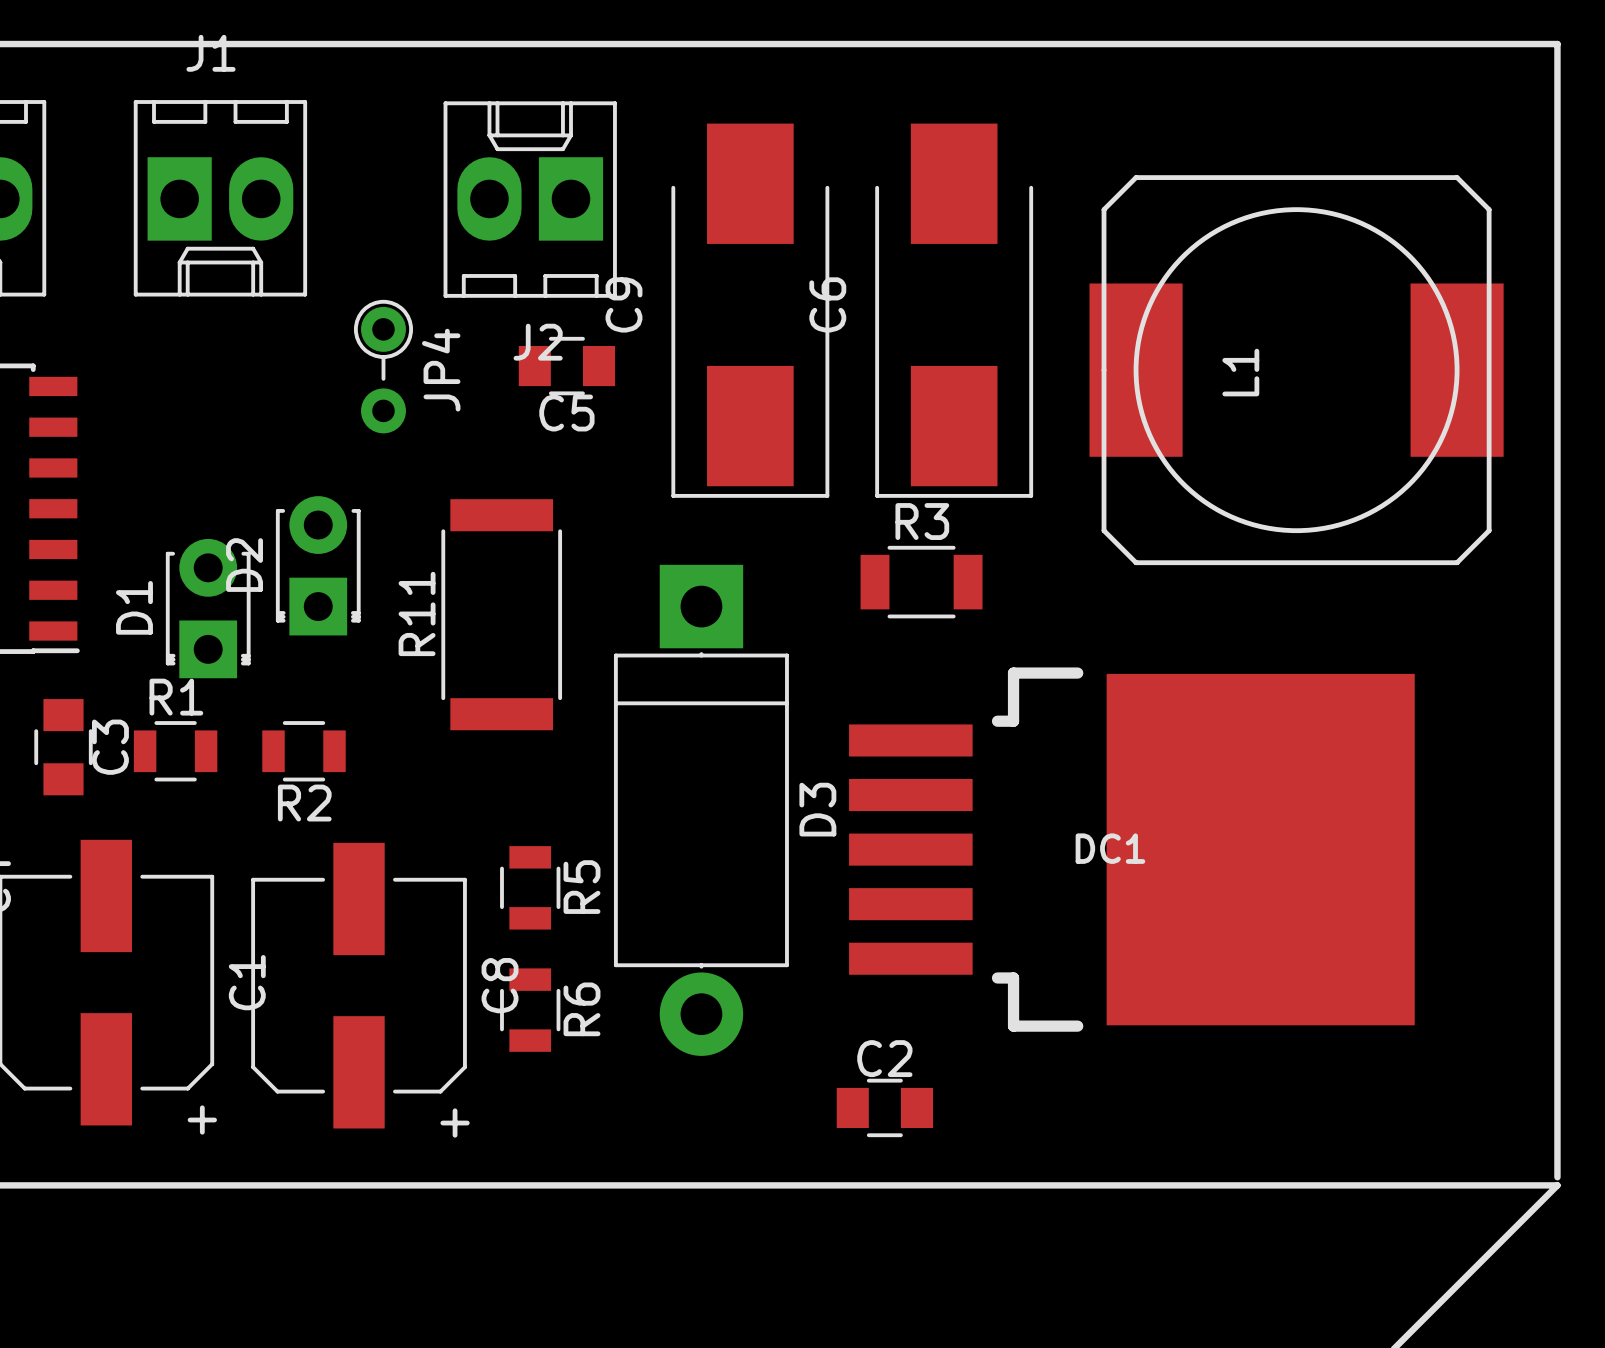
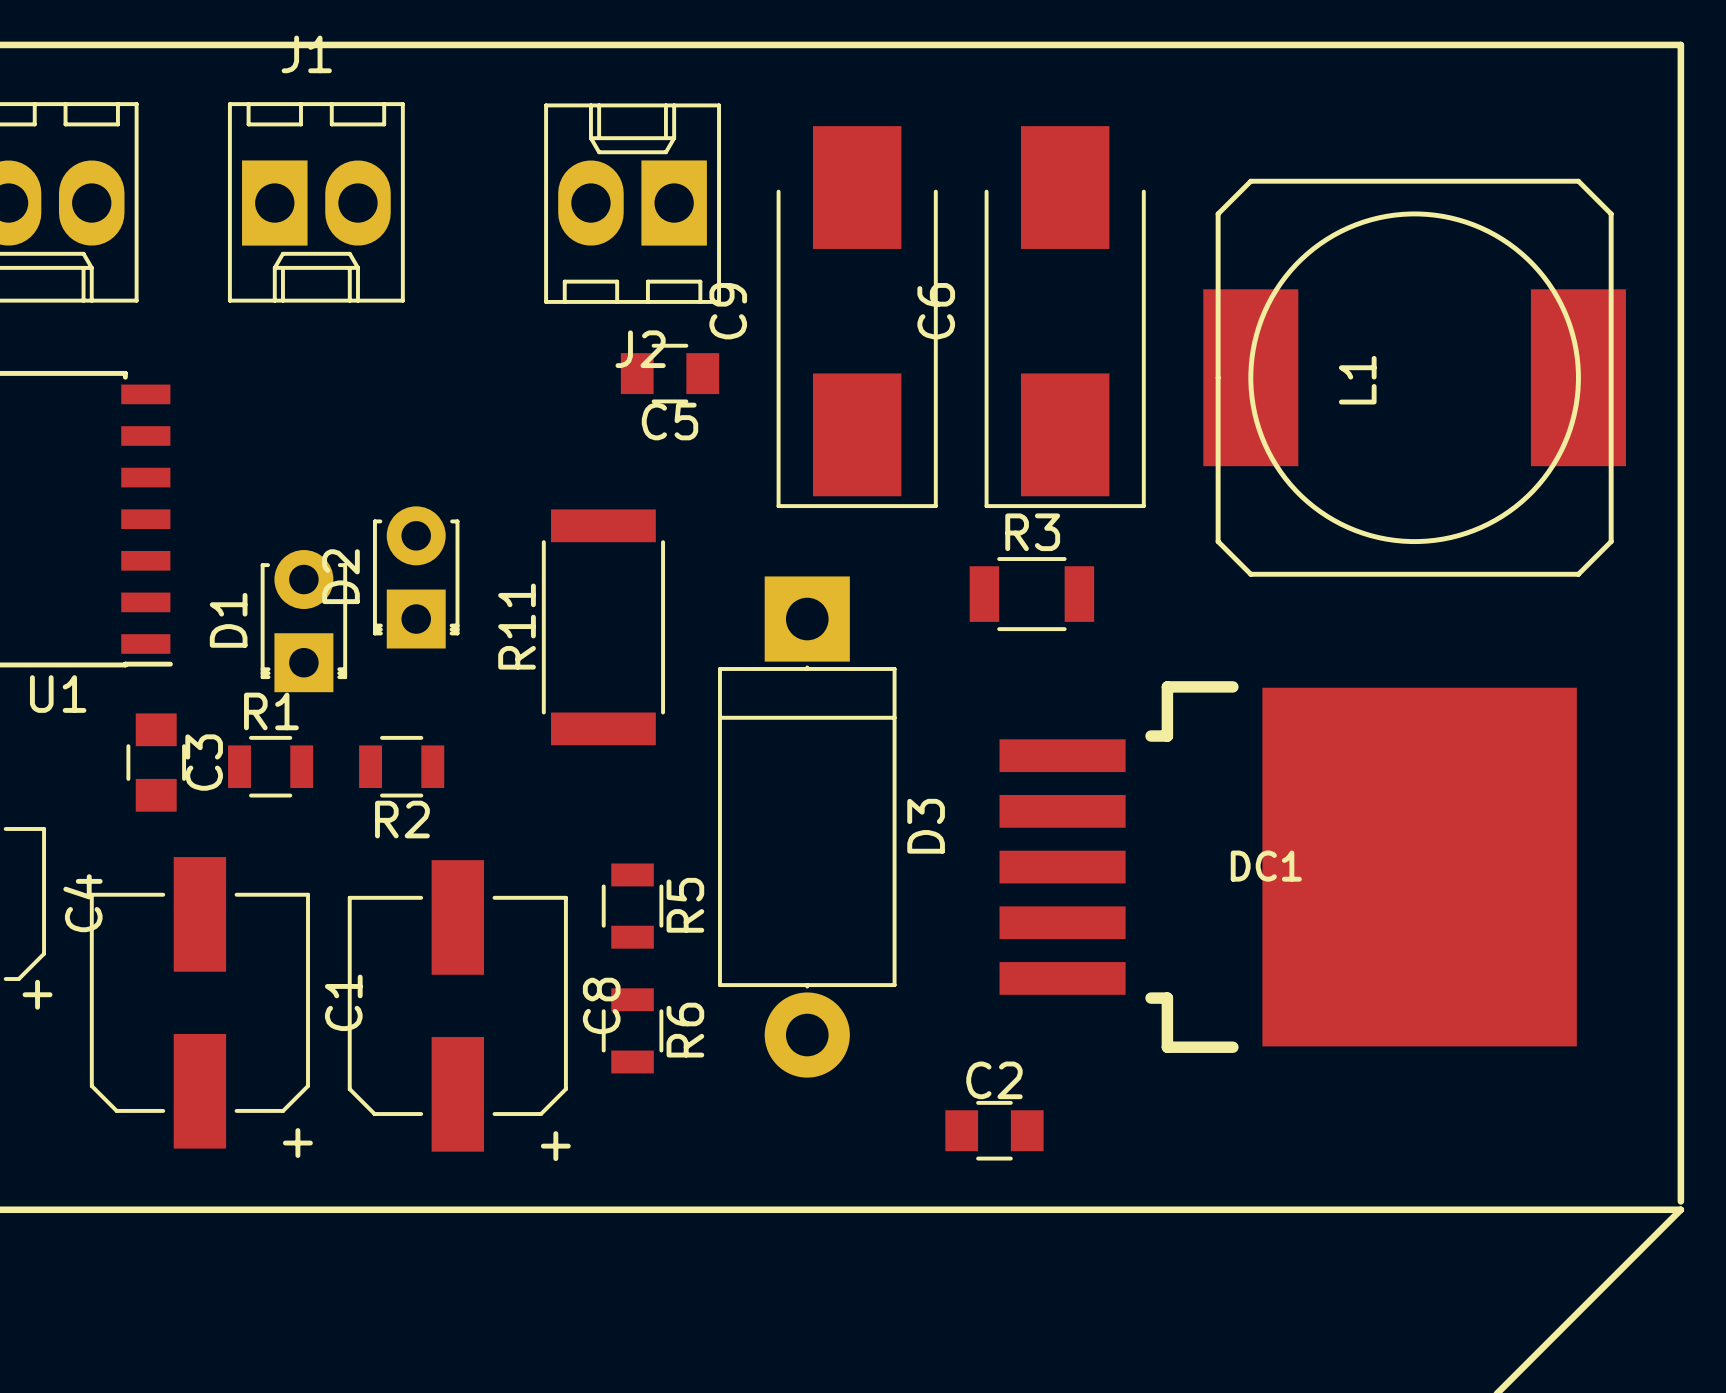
JP4: (383, 366) -> none
DC1 position: (1131, 849) -> (1288, 867)

